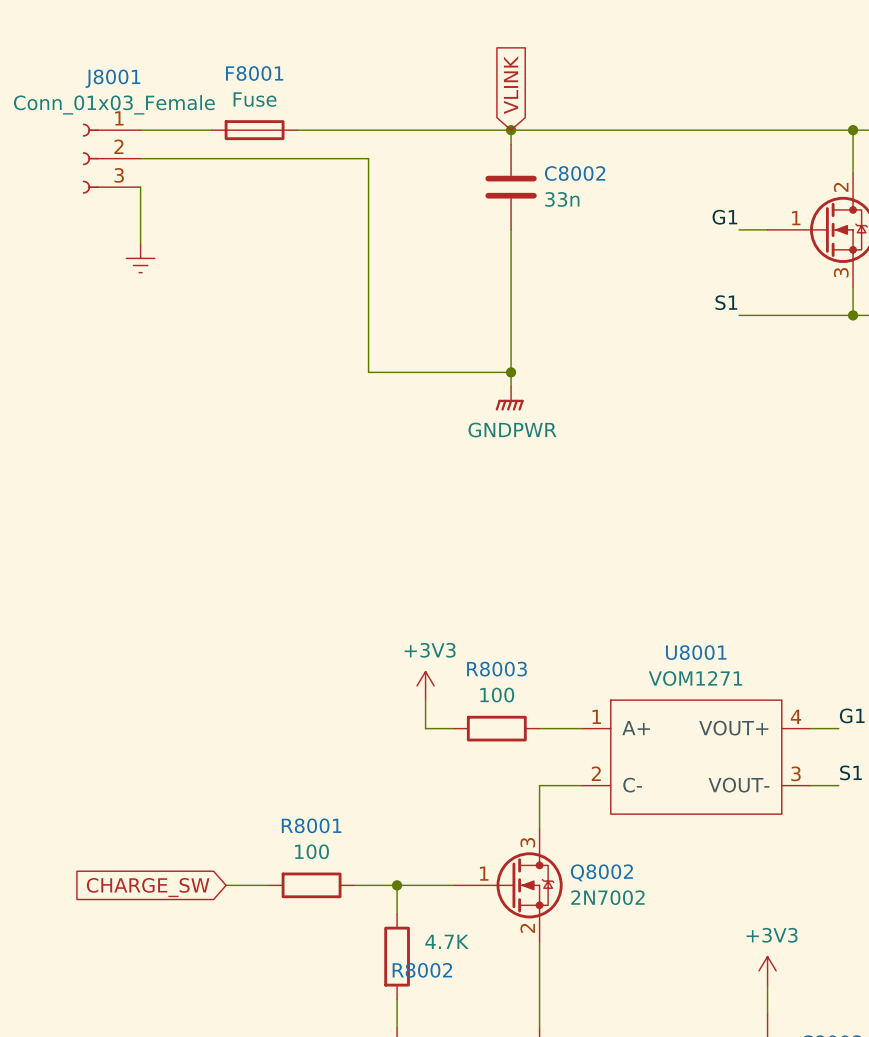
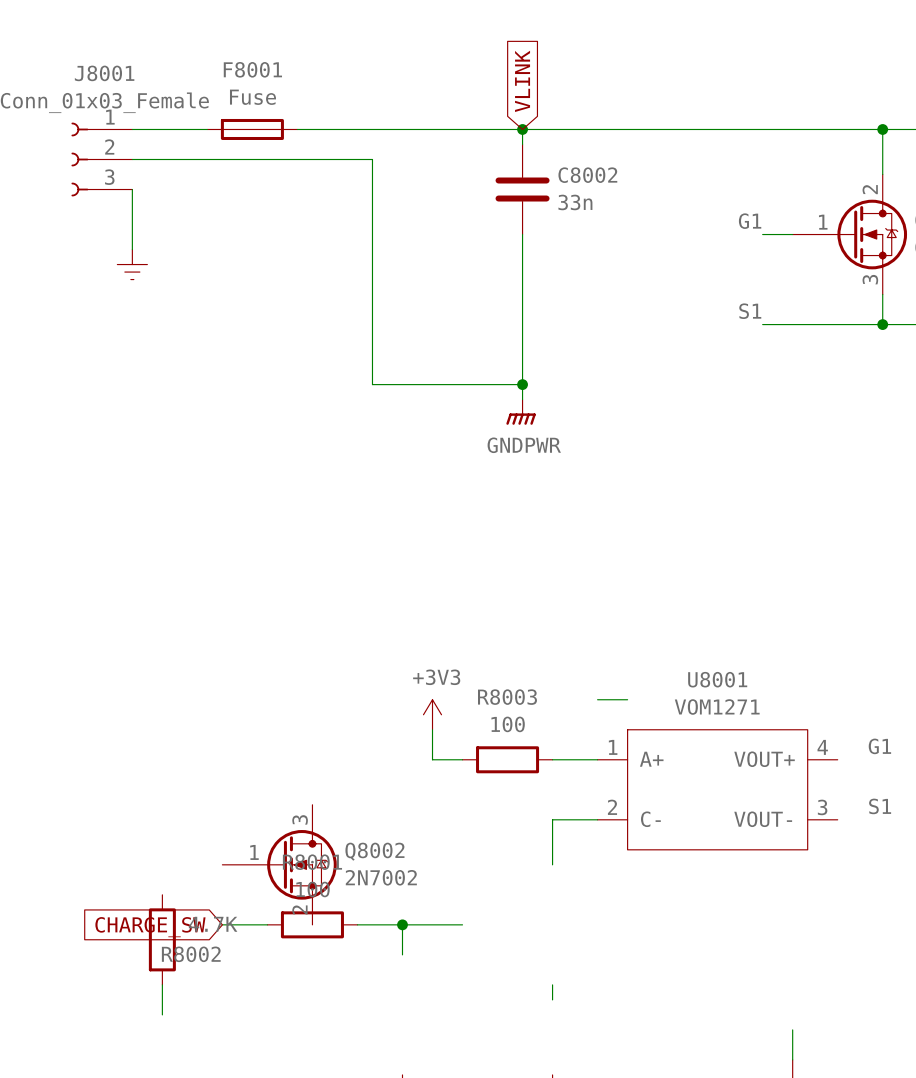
wire: (810, 728) (838, 728) -> (597, 699) (627, 699)
wire: (810, 785) (838, 785) -> none
Q8002 position: (508, 885) -> (279, 864)
R8002 position: (397, 956) -> (162, 939)
wire: (539, 956) (539, 1027) -> none
power symbol: +3V3 (767, 970) -> none
wire: (397, 999) (397, 1027) -> (162, 984) (162, 1014)

